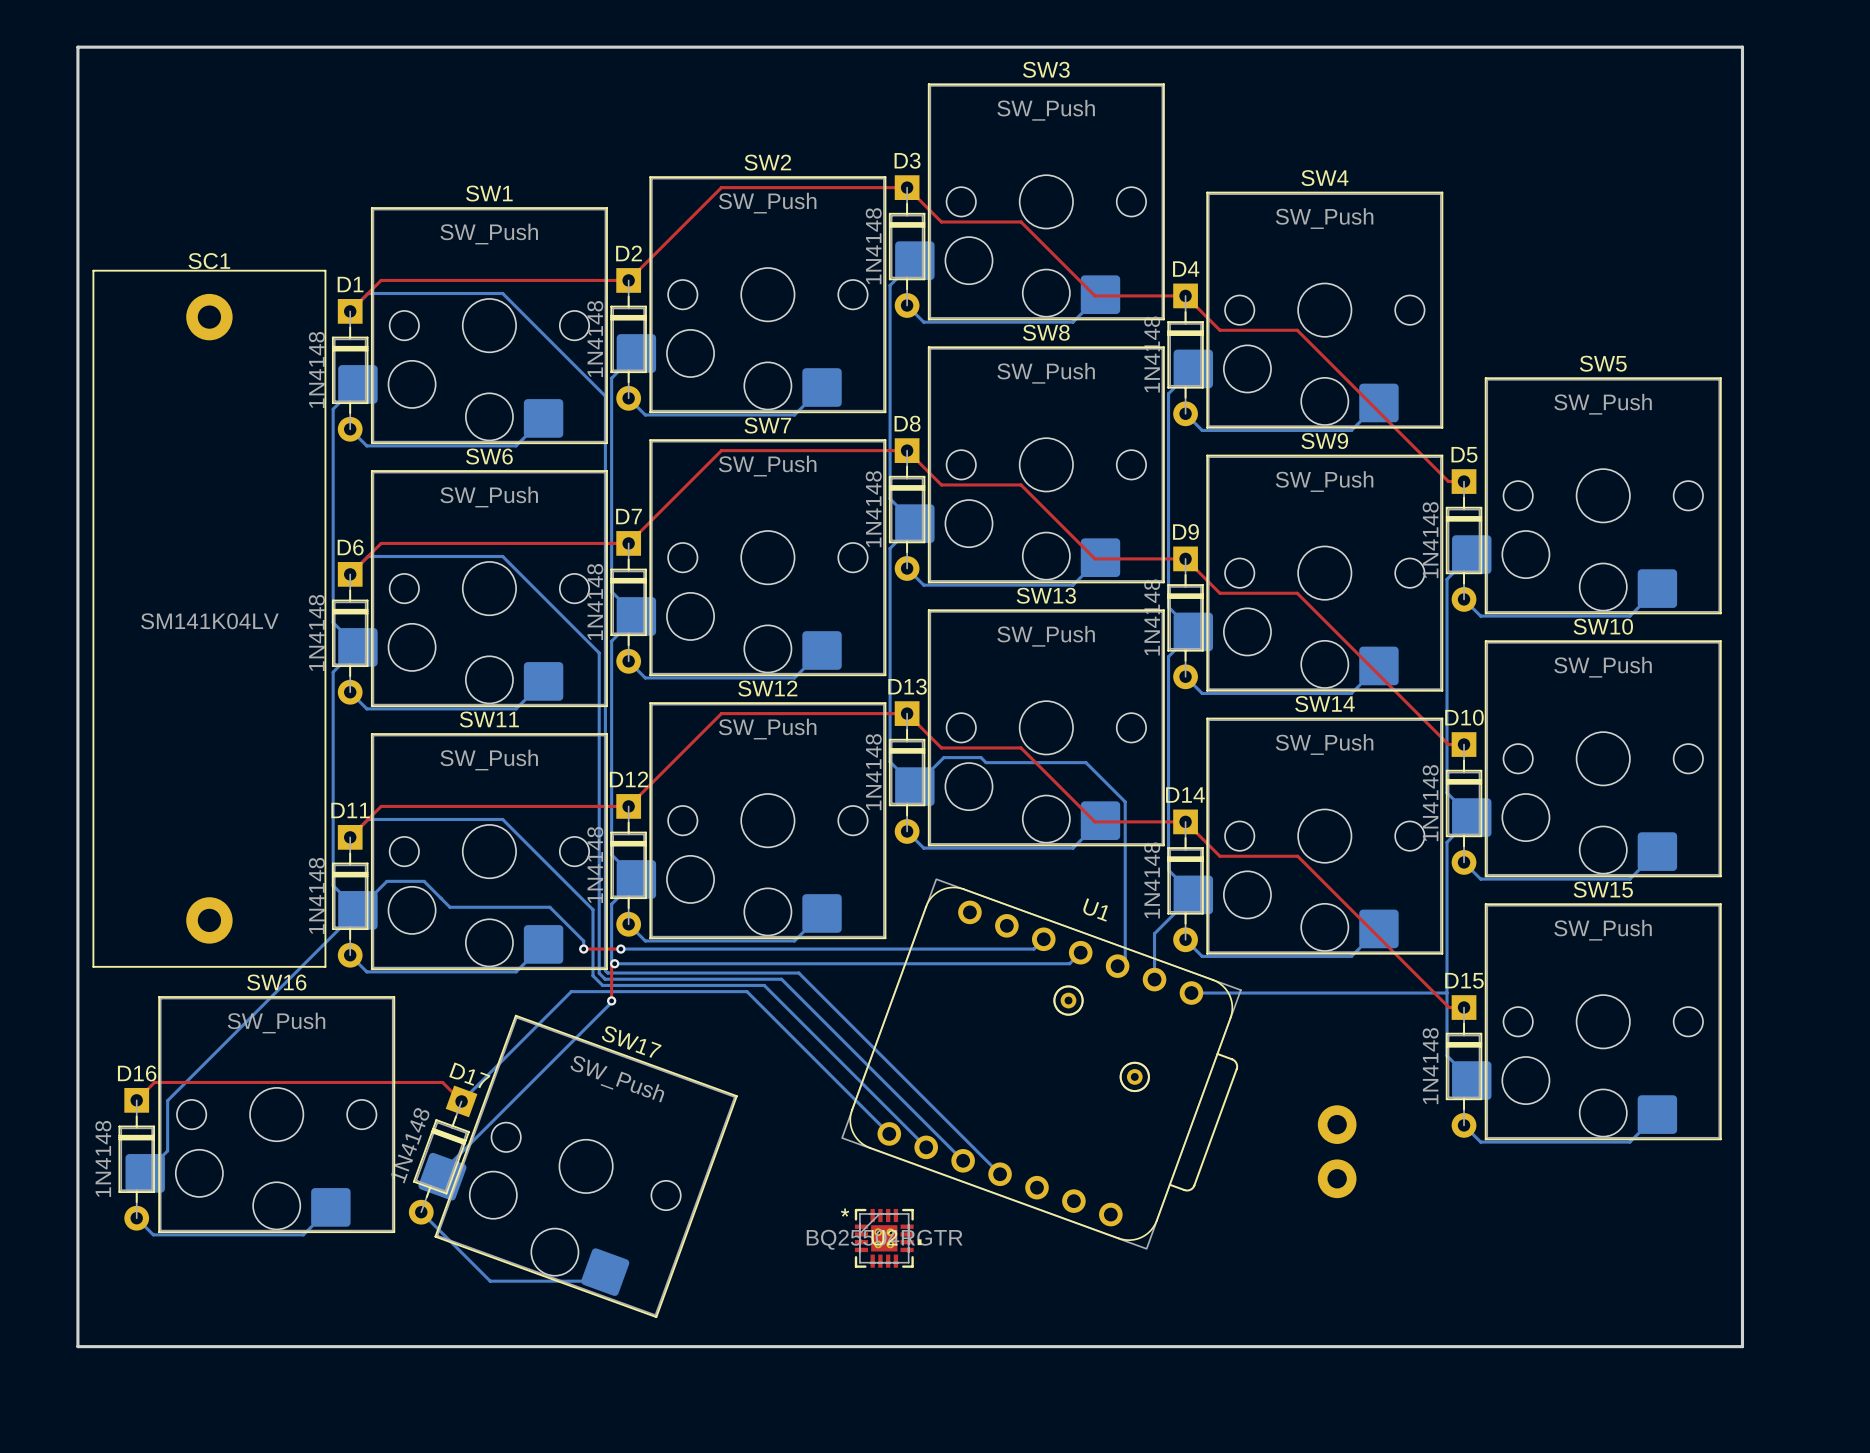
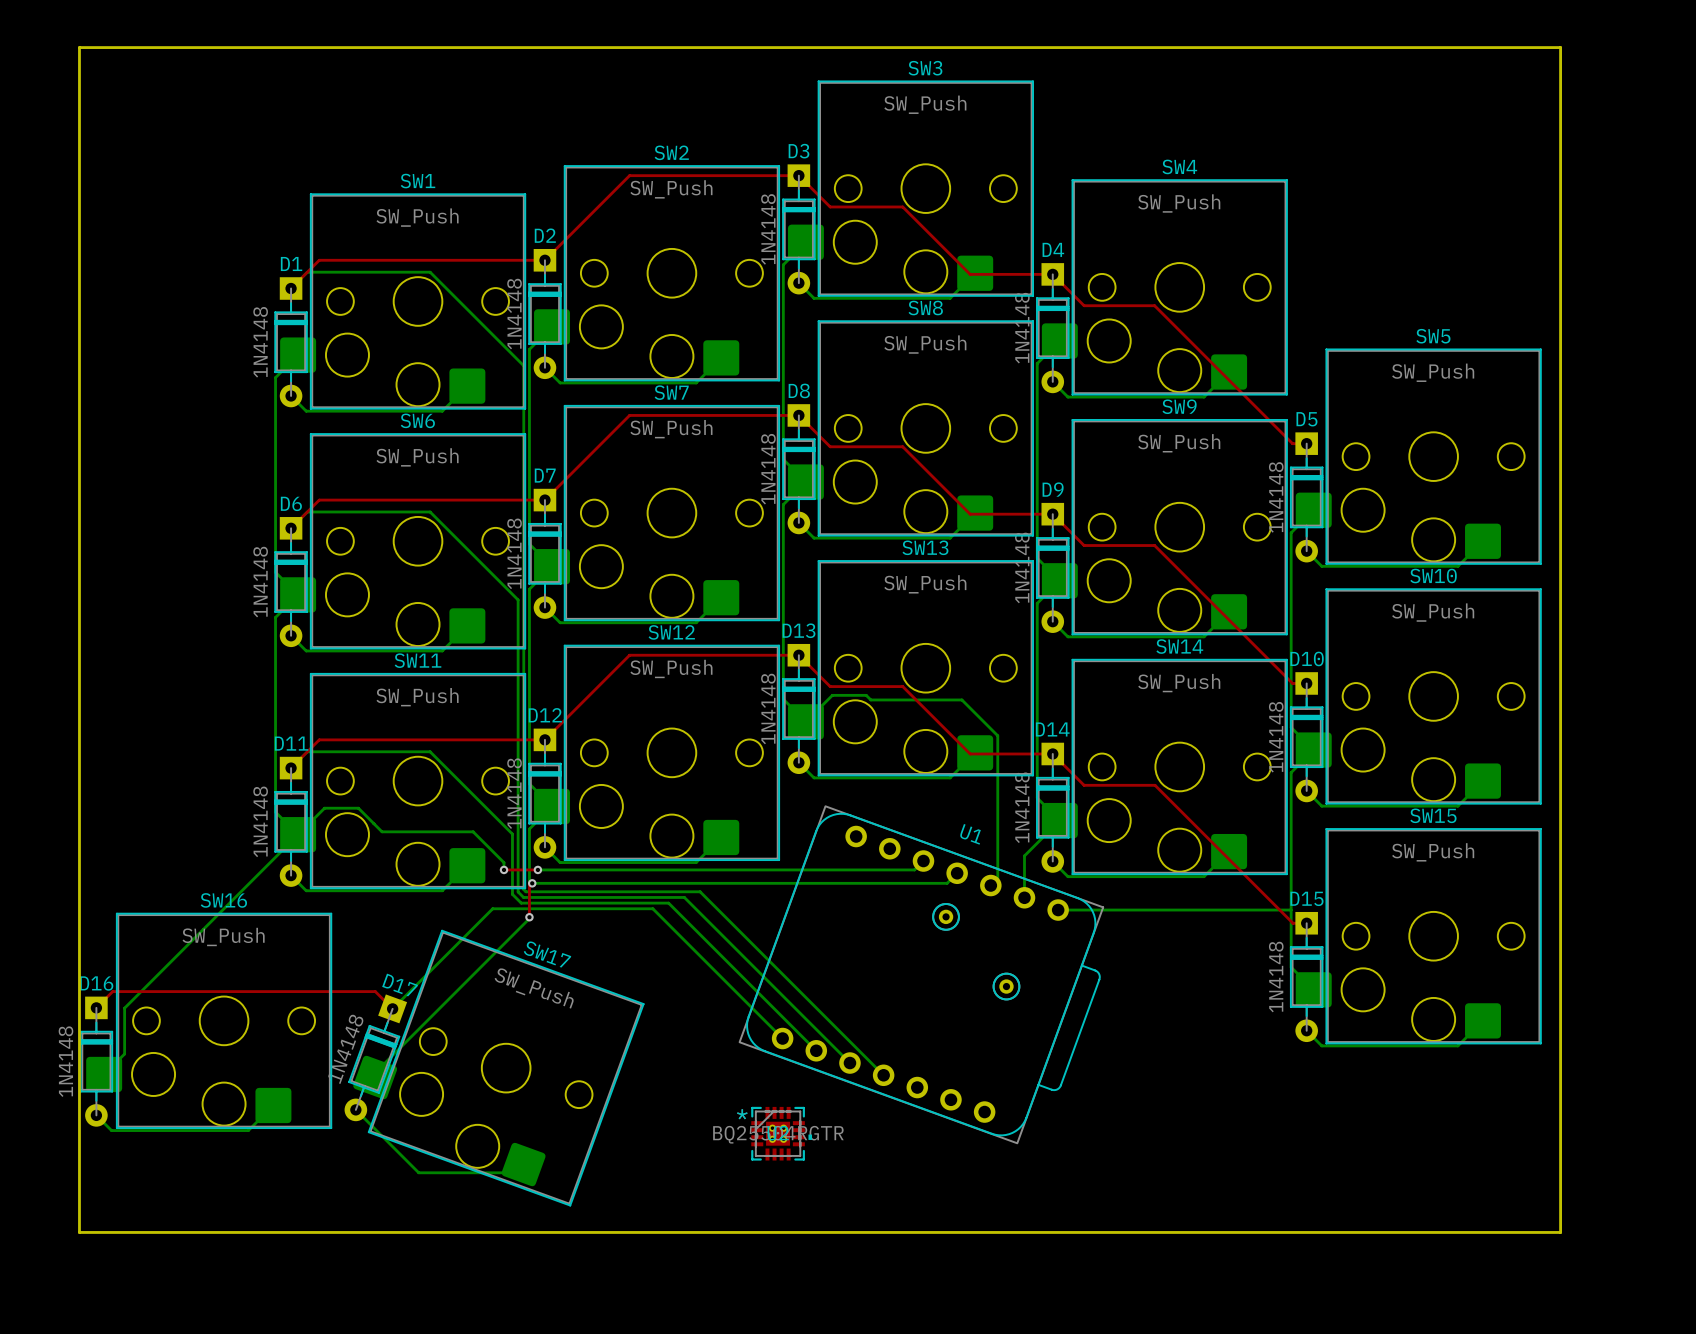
board edge: (118, 47) (77, 47) (77, 1346) (118, 1346) -> (79, 47) (79, 1232)
SC1: SM141K04LV (209, 618) -> none
part: (1337, 1124) -> none
part: (1337, 1178) -> none

